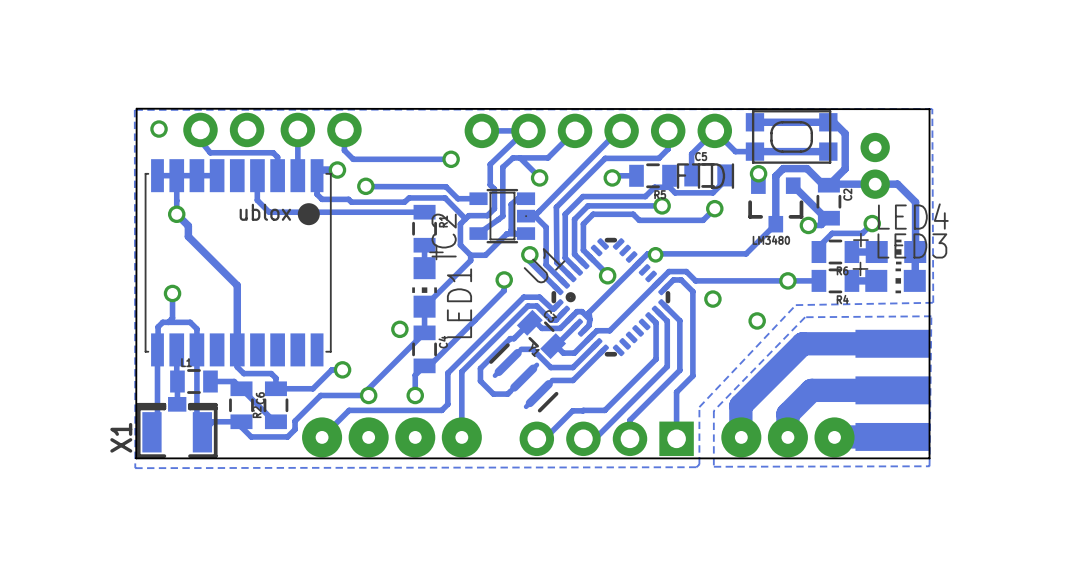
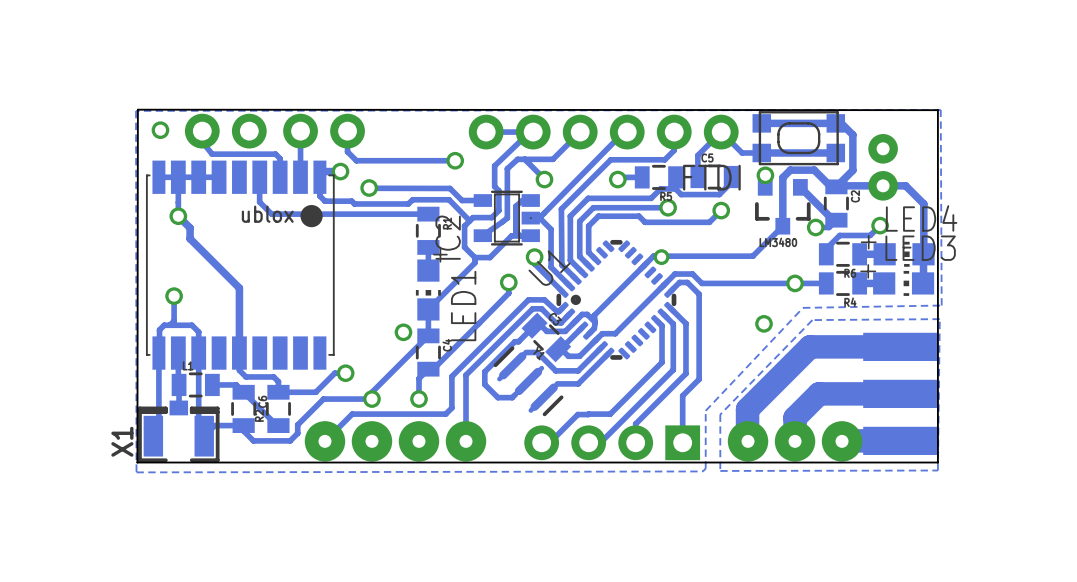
track: (590, 256) (607, 275) -> none
via: (607, 275) -> none
via: (712, 299) -> none

